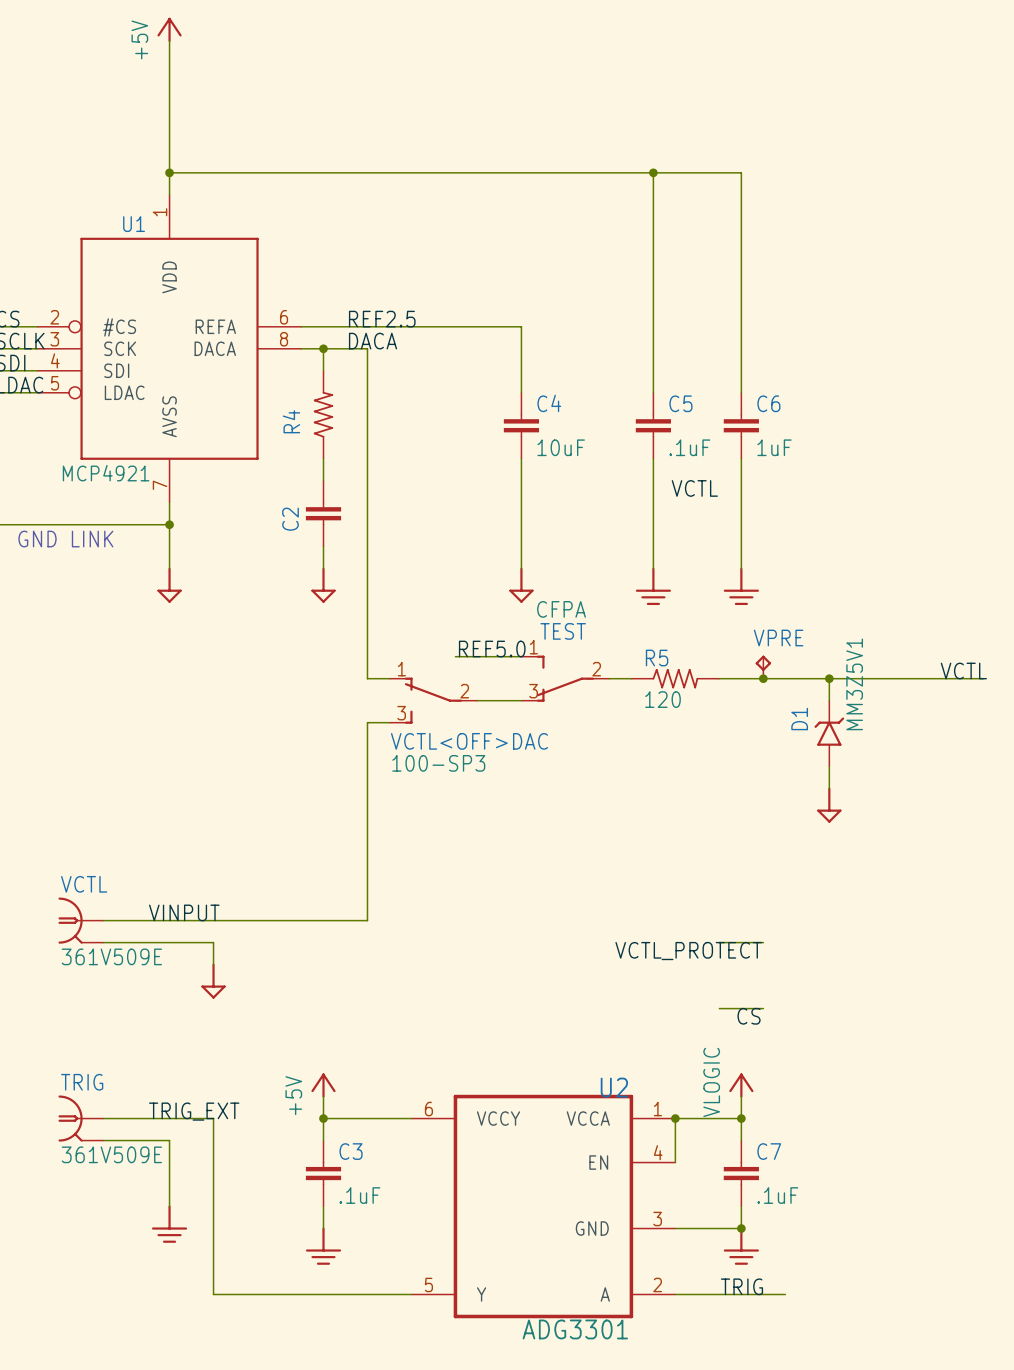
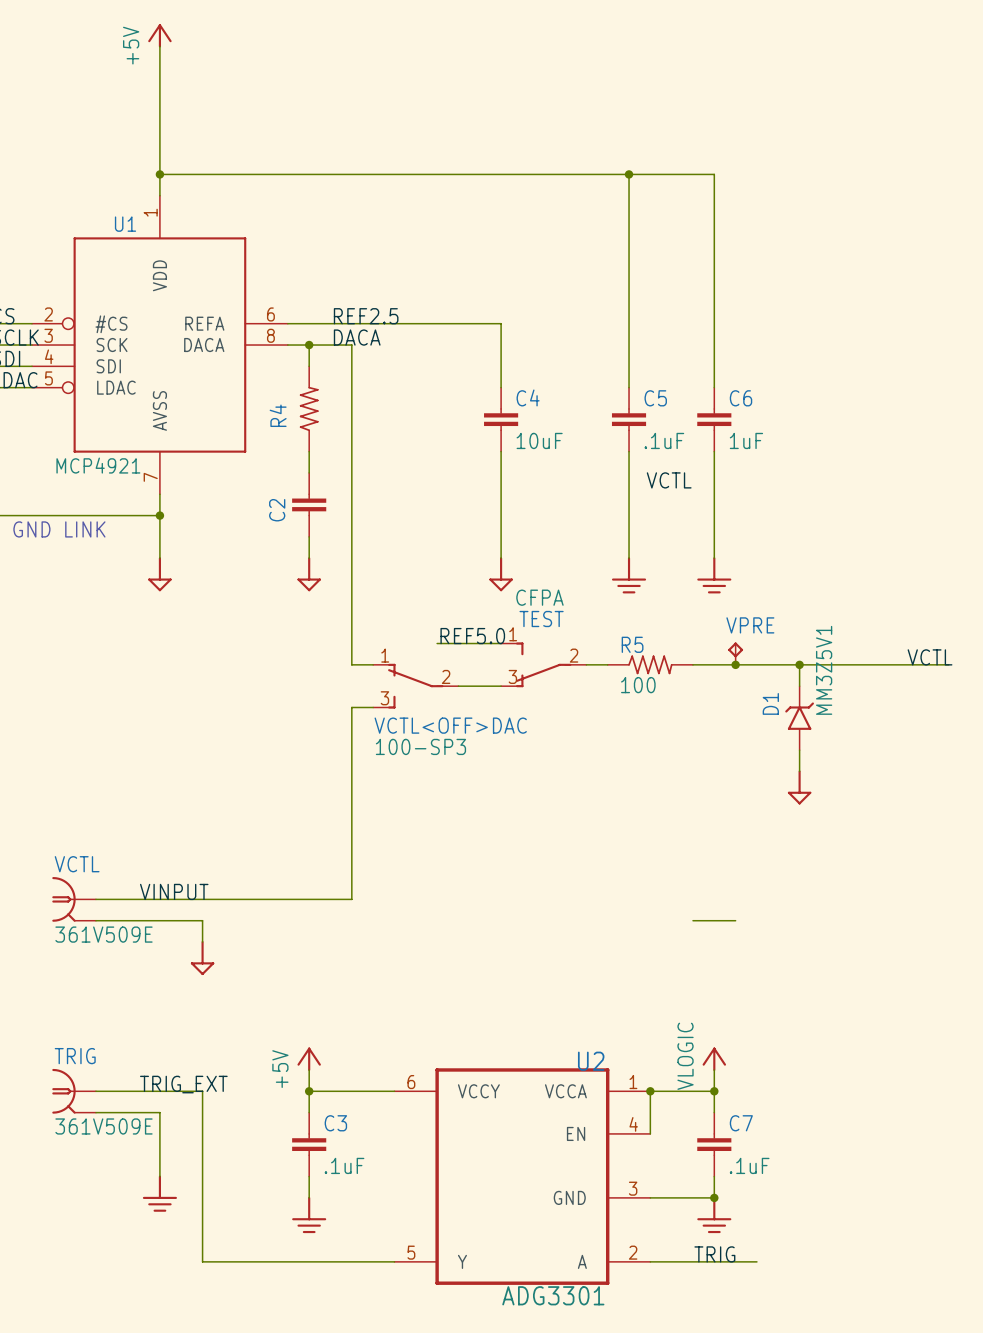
R5 value: 120 (663, 699) -> 100 (638, 685)
label: VCTL_PROTECT (688, 951) -> none
wire: (719, 1008) (763, 1008) -> none
label: CS (749, 1016) -> none

